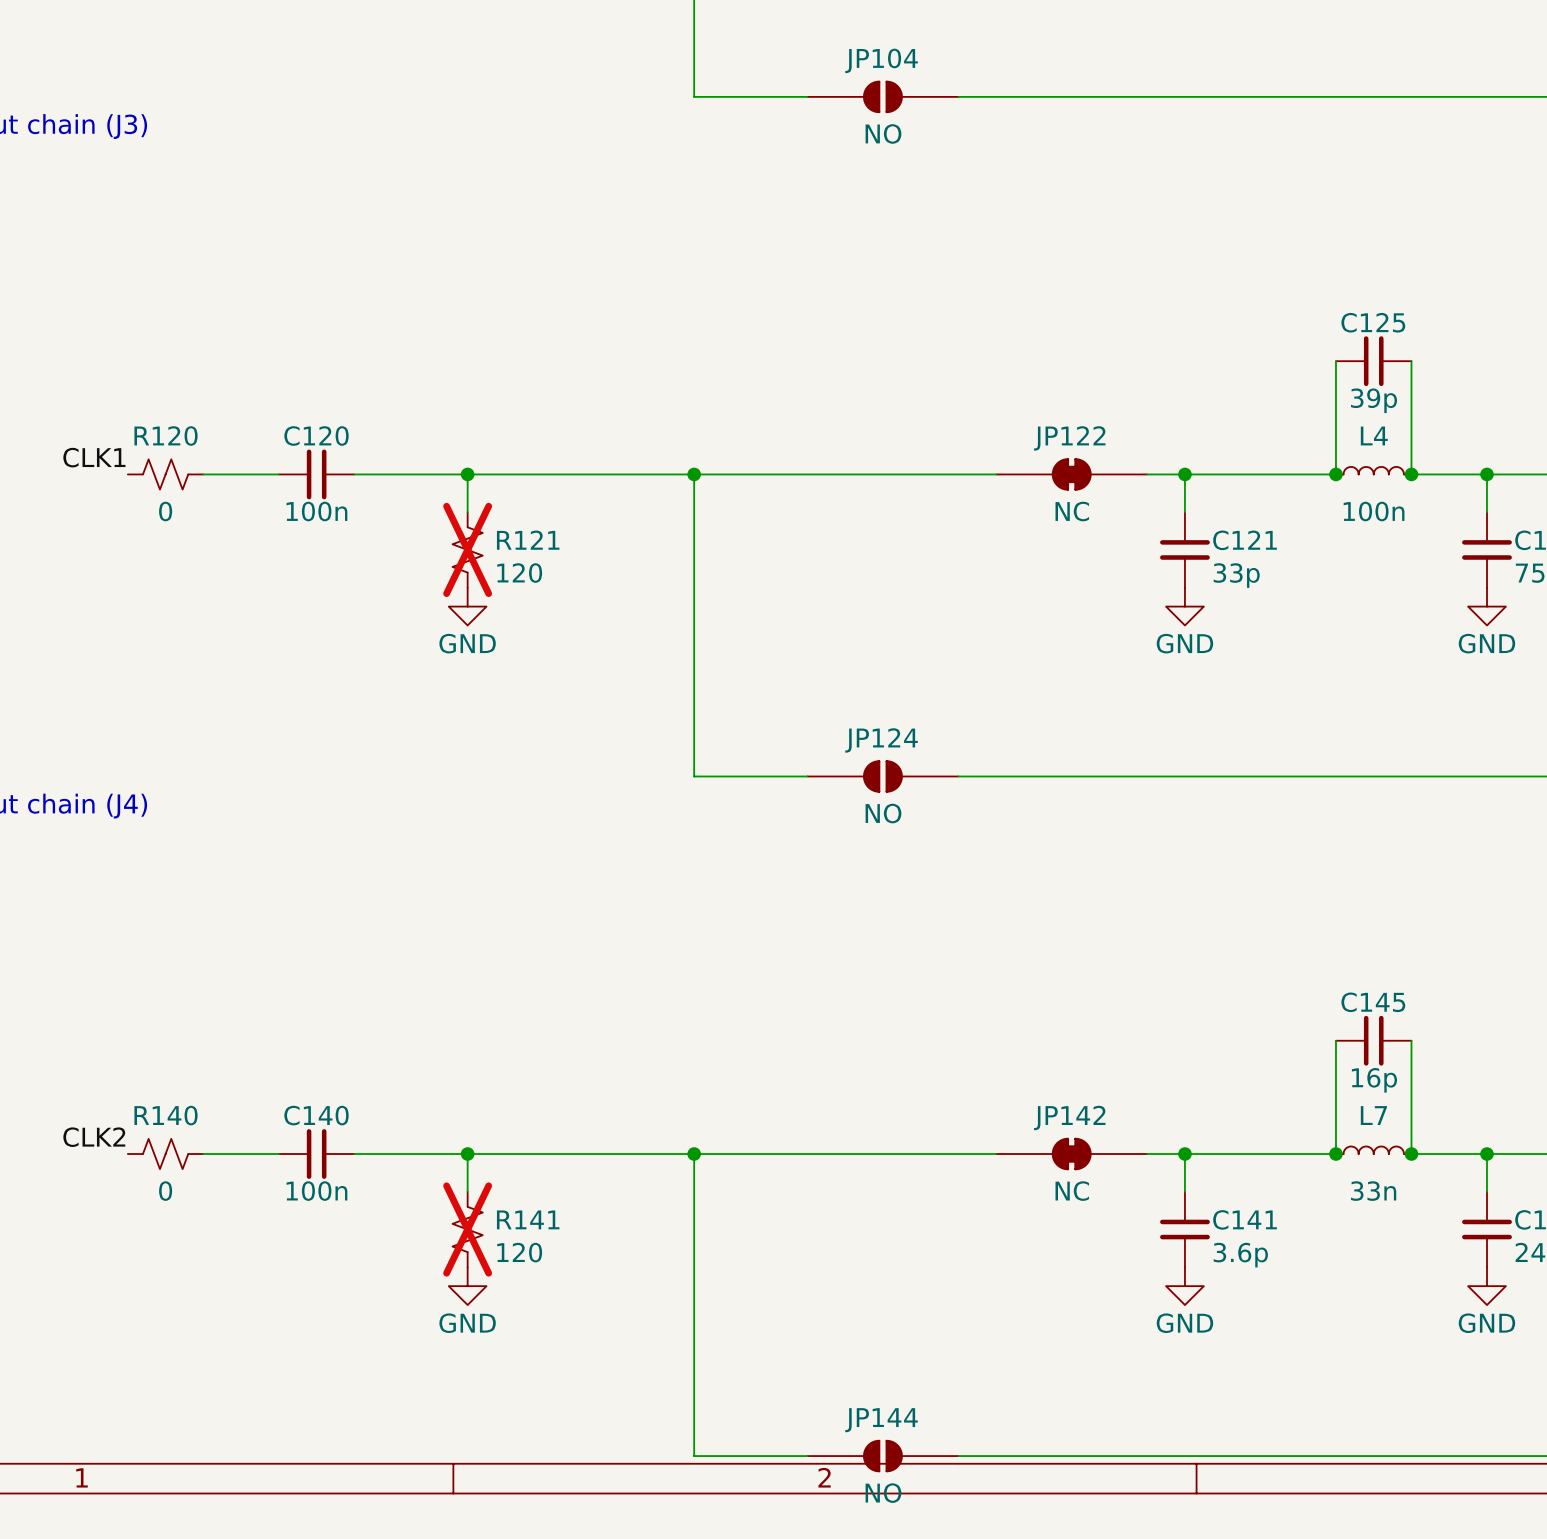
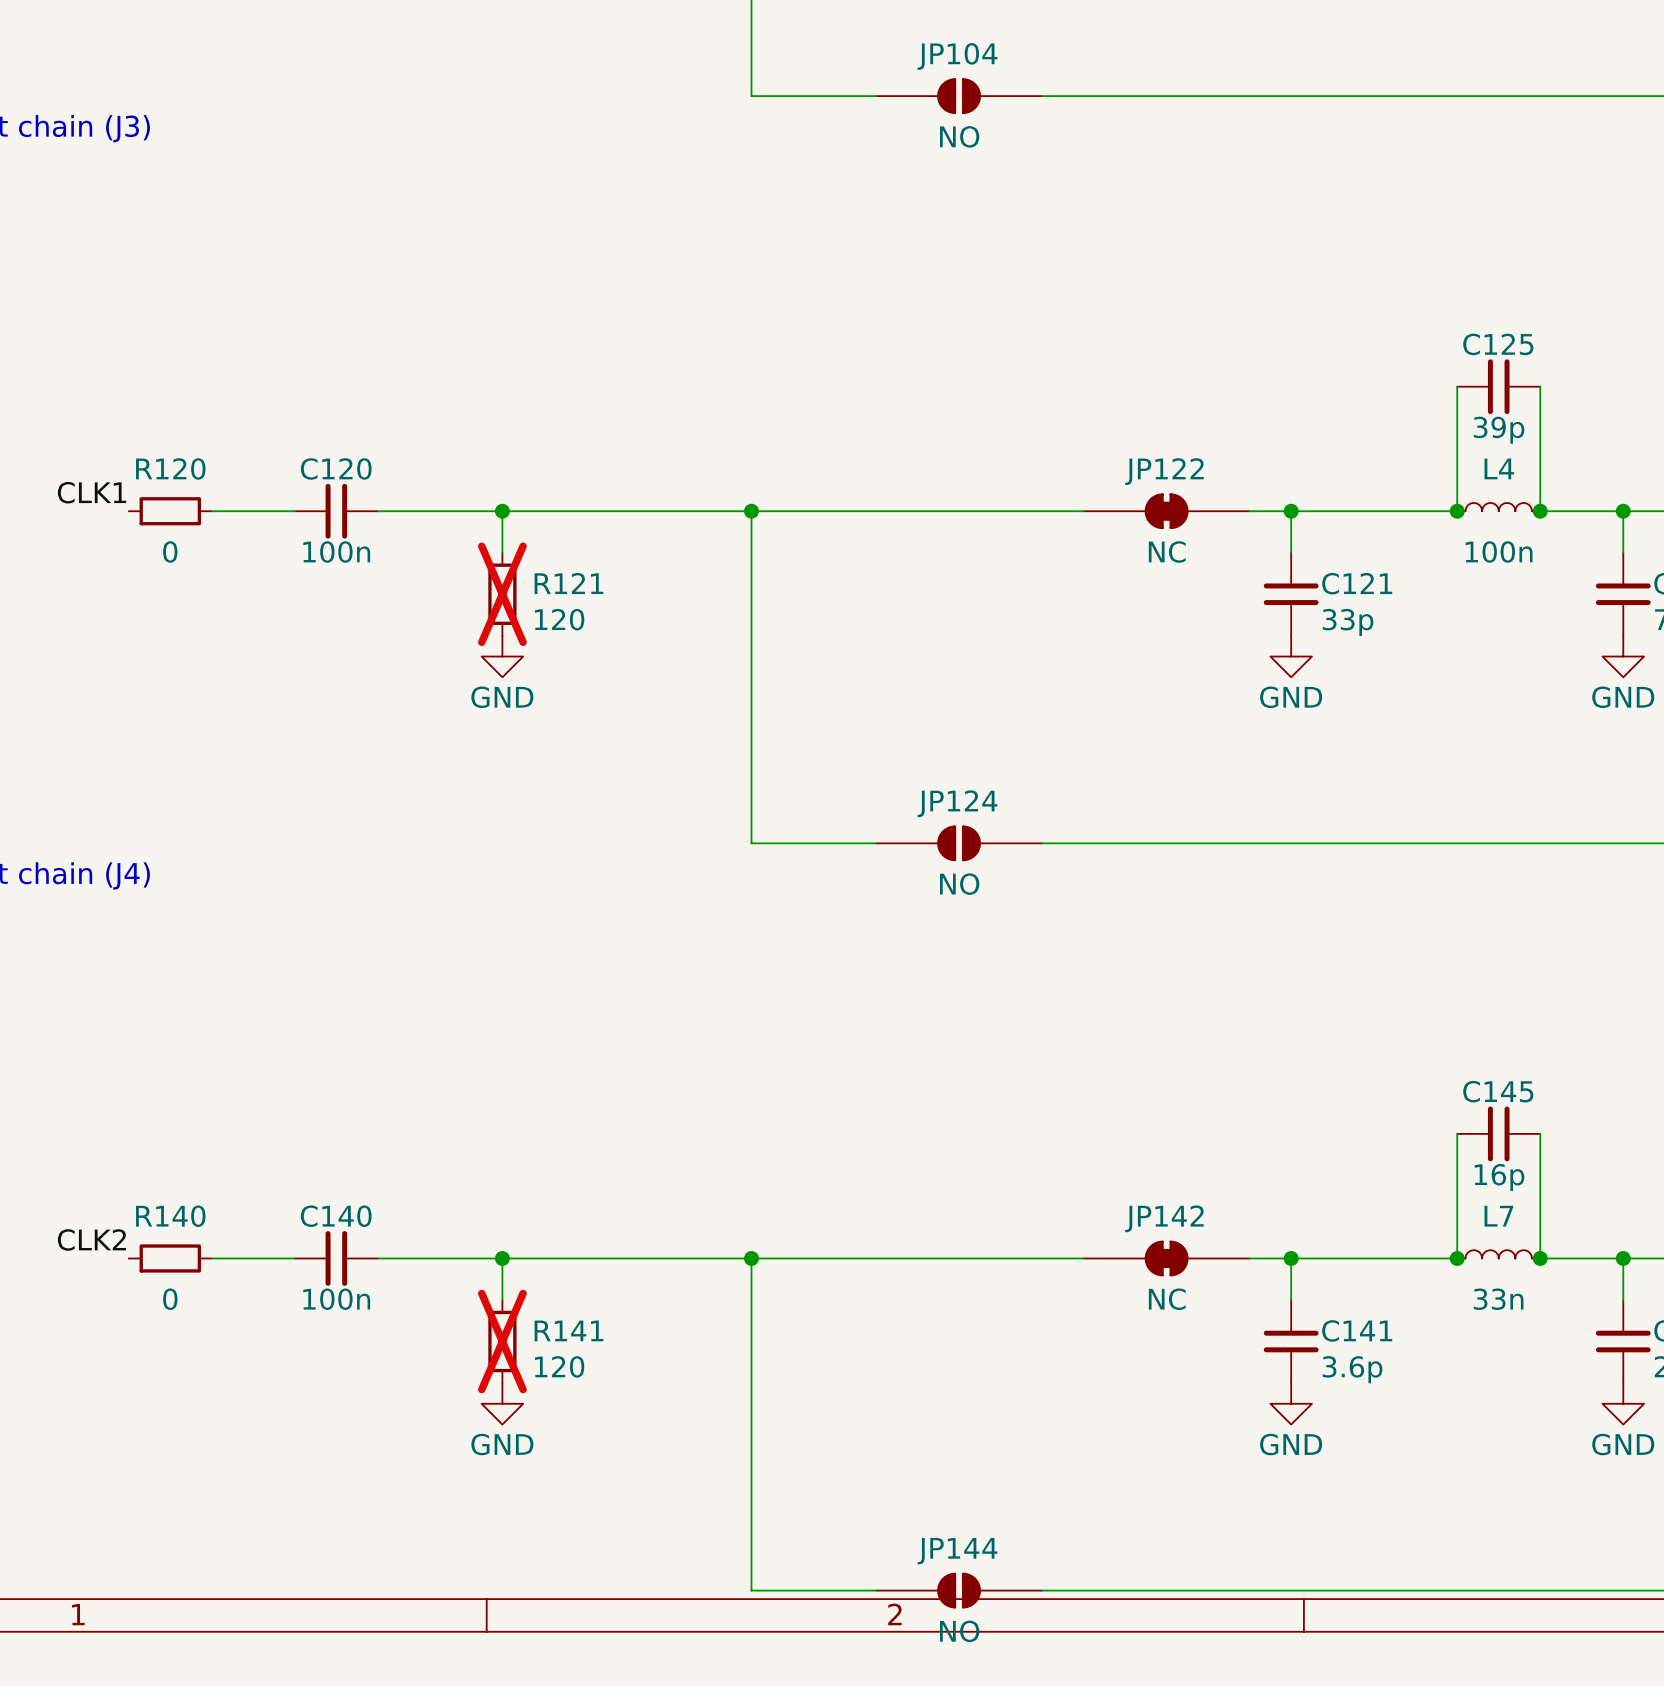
R120 symbol: [127, 459, 204, 490] -> [128, 497, 212, 526]
R121 symbol: [452, 512, 483, 588] -> [488, 552, 517, 636]
R140 symbol: [127, 1138, 204, 1170] -> [128, 1244, 212, 1273]
R141 symbol: [452, 1191, 483, 1268] -> [488, 1300, 517, 1384]

